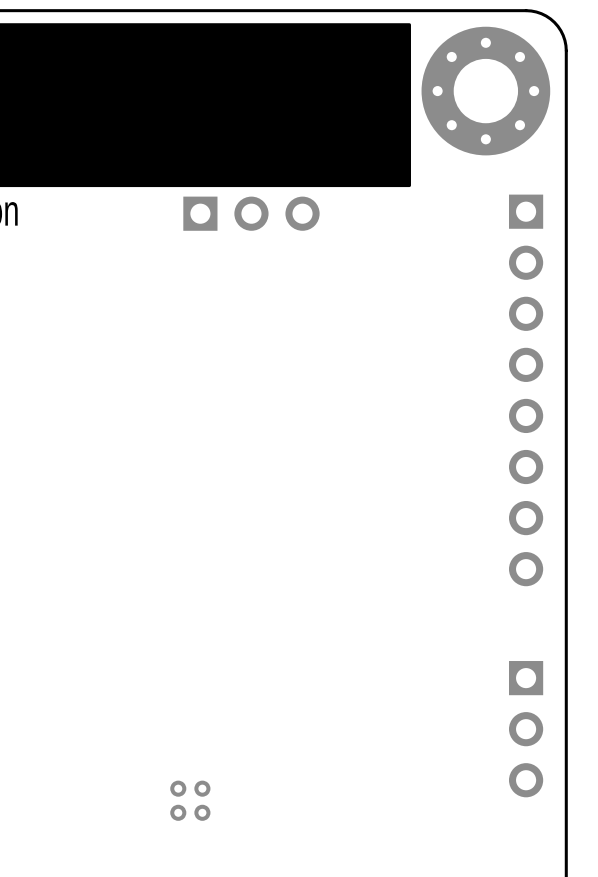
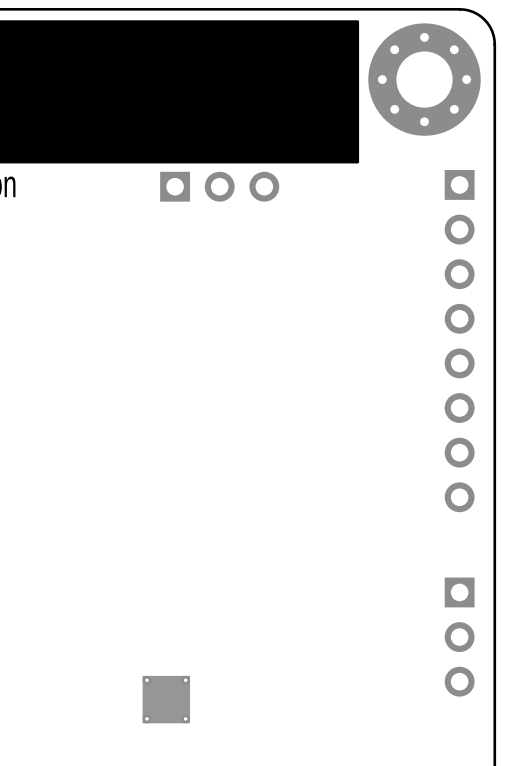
part footprint: [170, 780, 211, 821] -> [142, 675, 191, 724]

